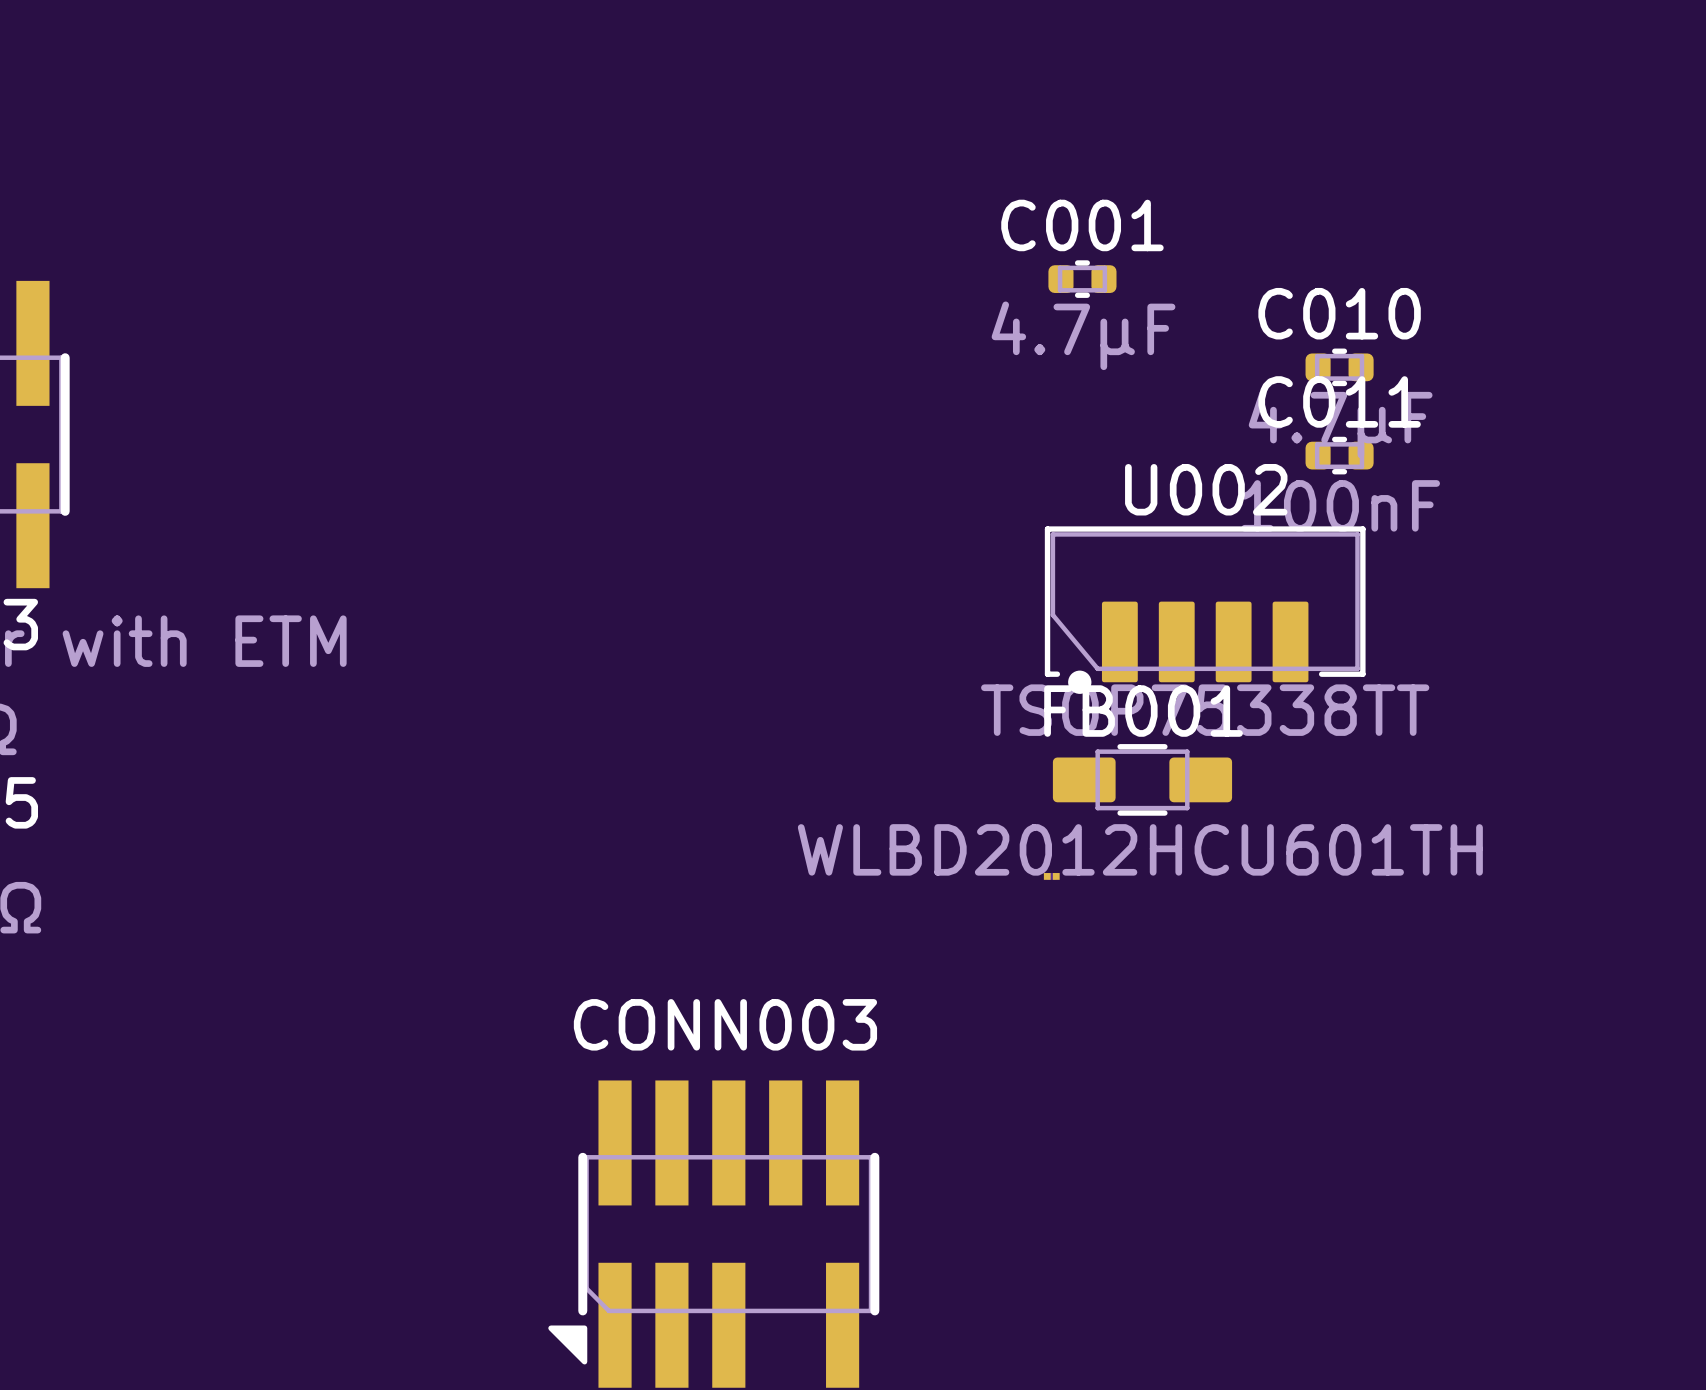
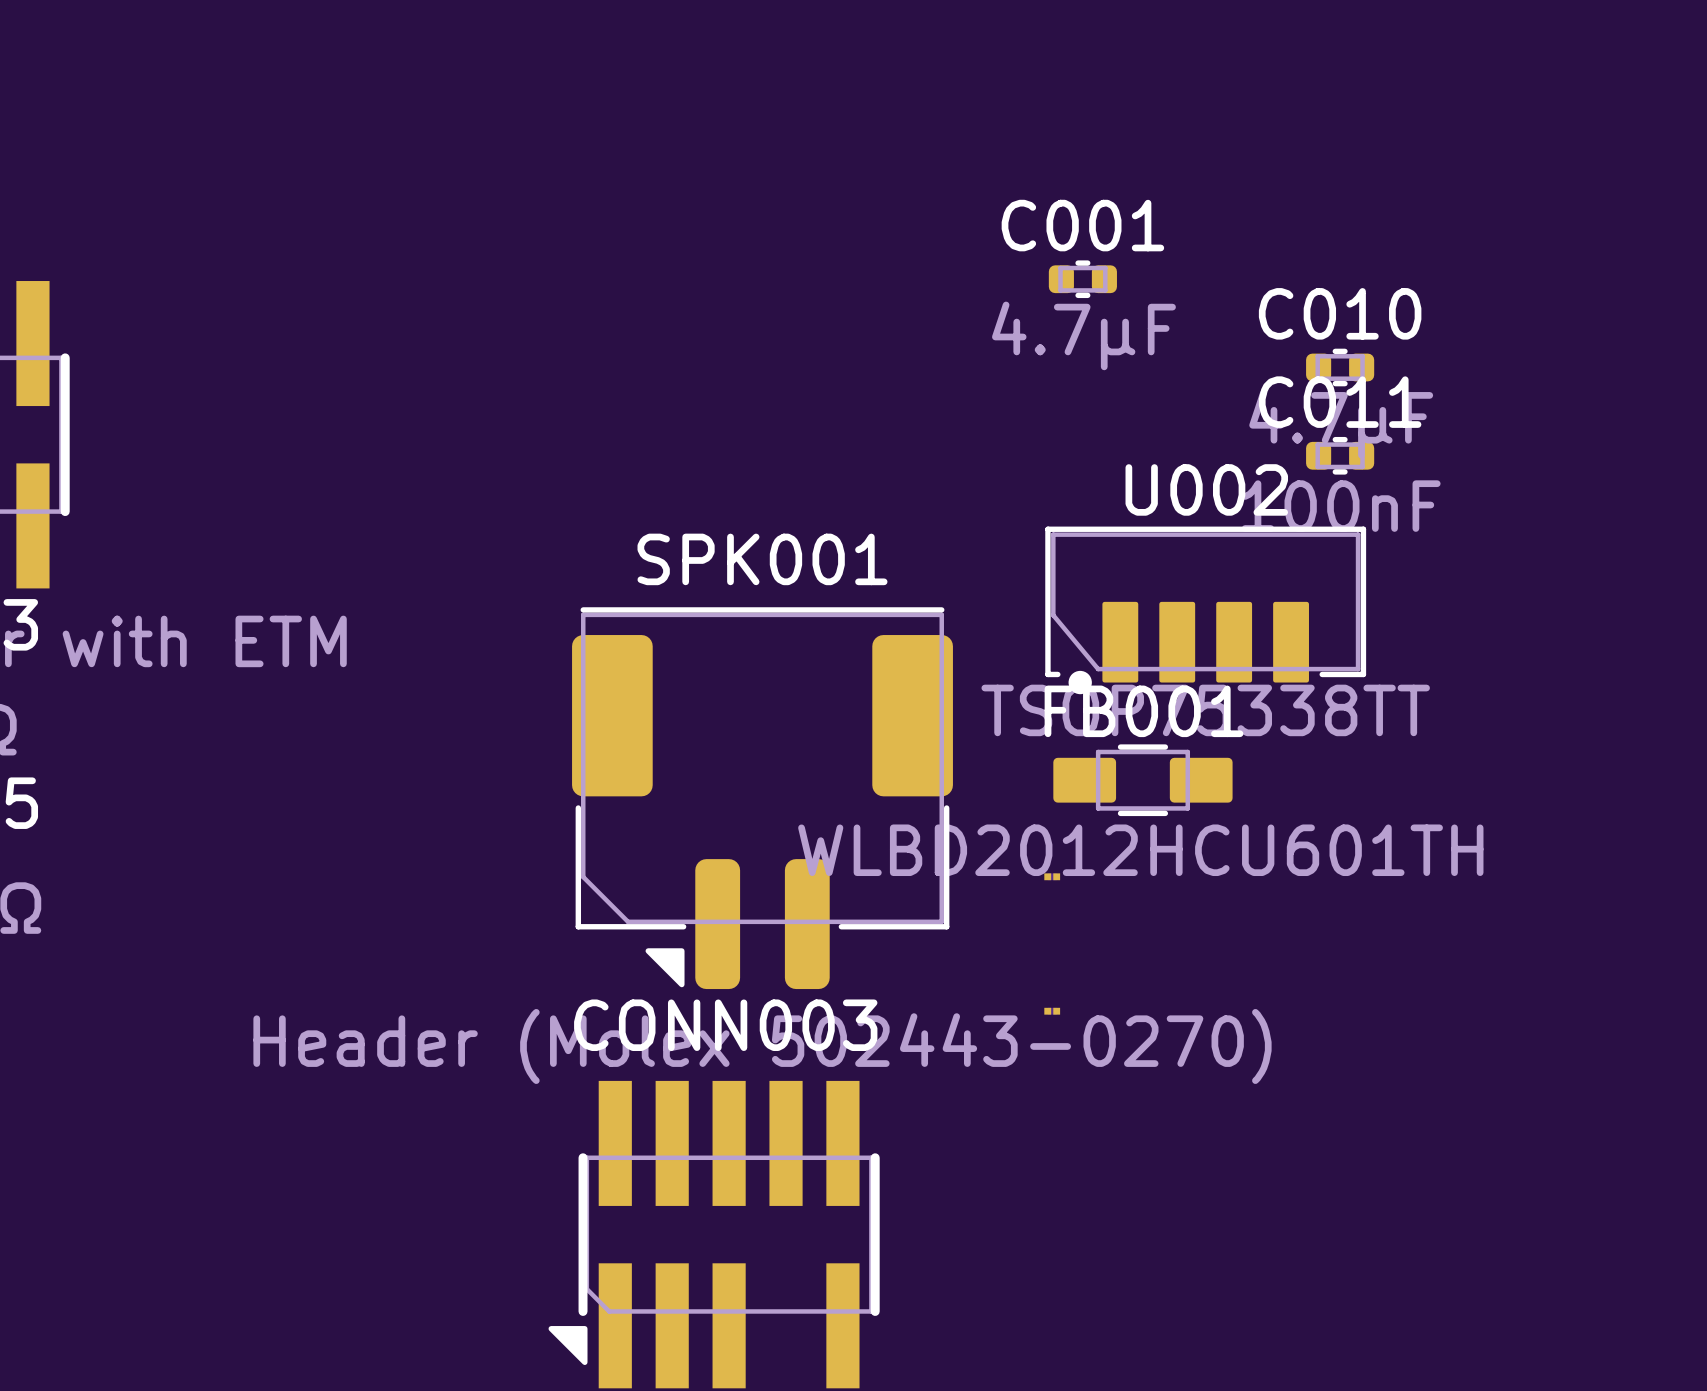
SPK001: none -> Header (Molex 502443-0270) (762, 798)
part: none -> (1052, 1011)

